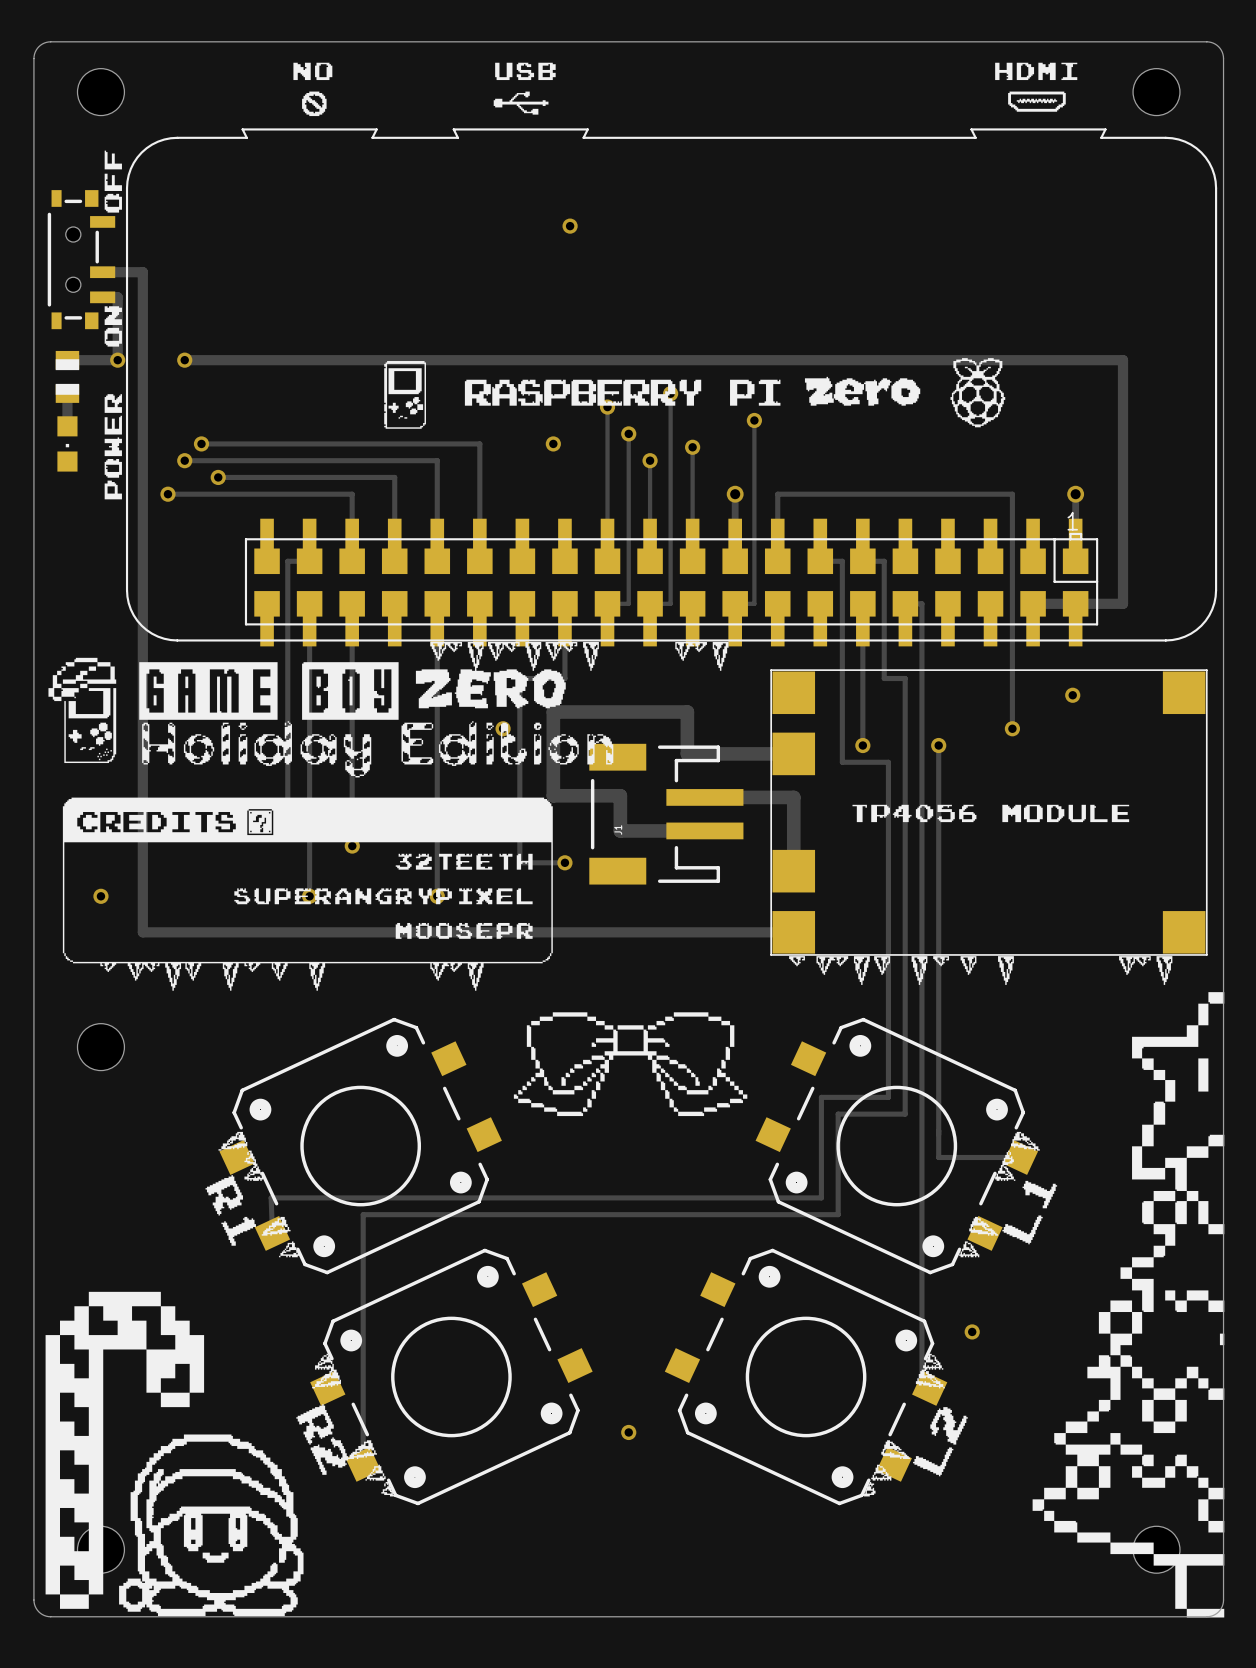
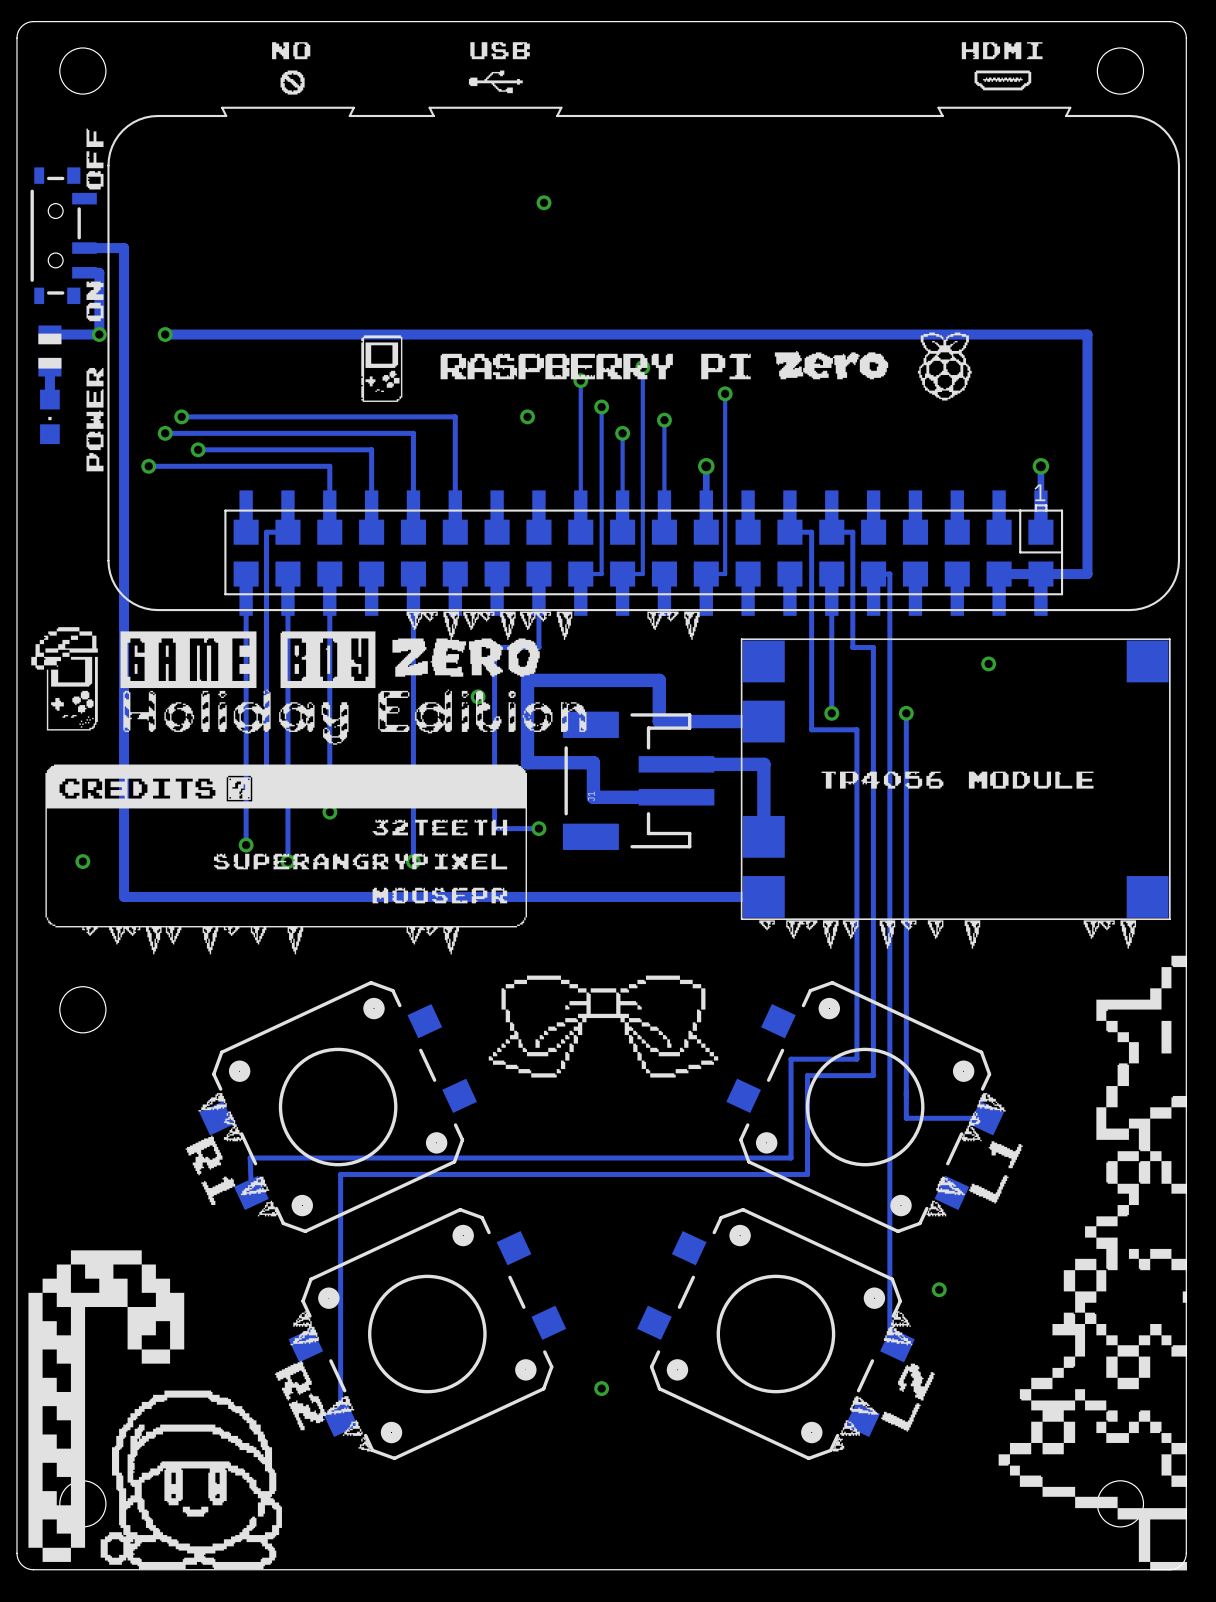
track: (777, 561) (777, 494) (1012, 494) (1012, 728) -> none
track: none -> (246, 598) (246, 845)
via: none -> (988, 663)
via: (1072, 695) -> none
via: (1012, 728) -> none
via: none -> (246, 845)

